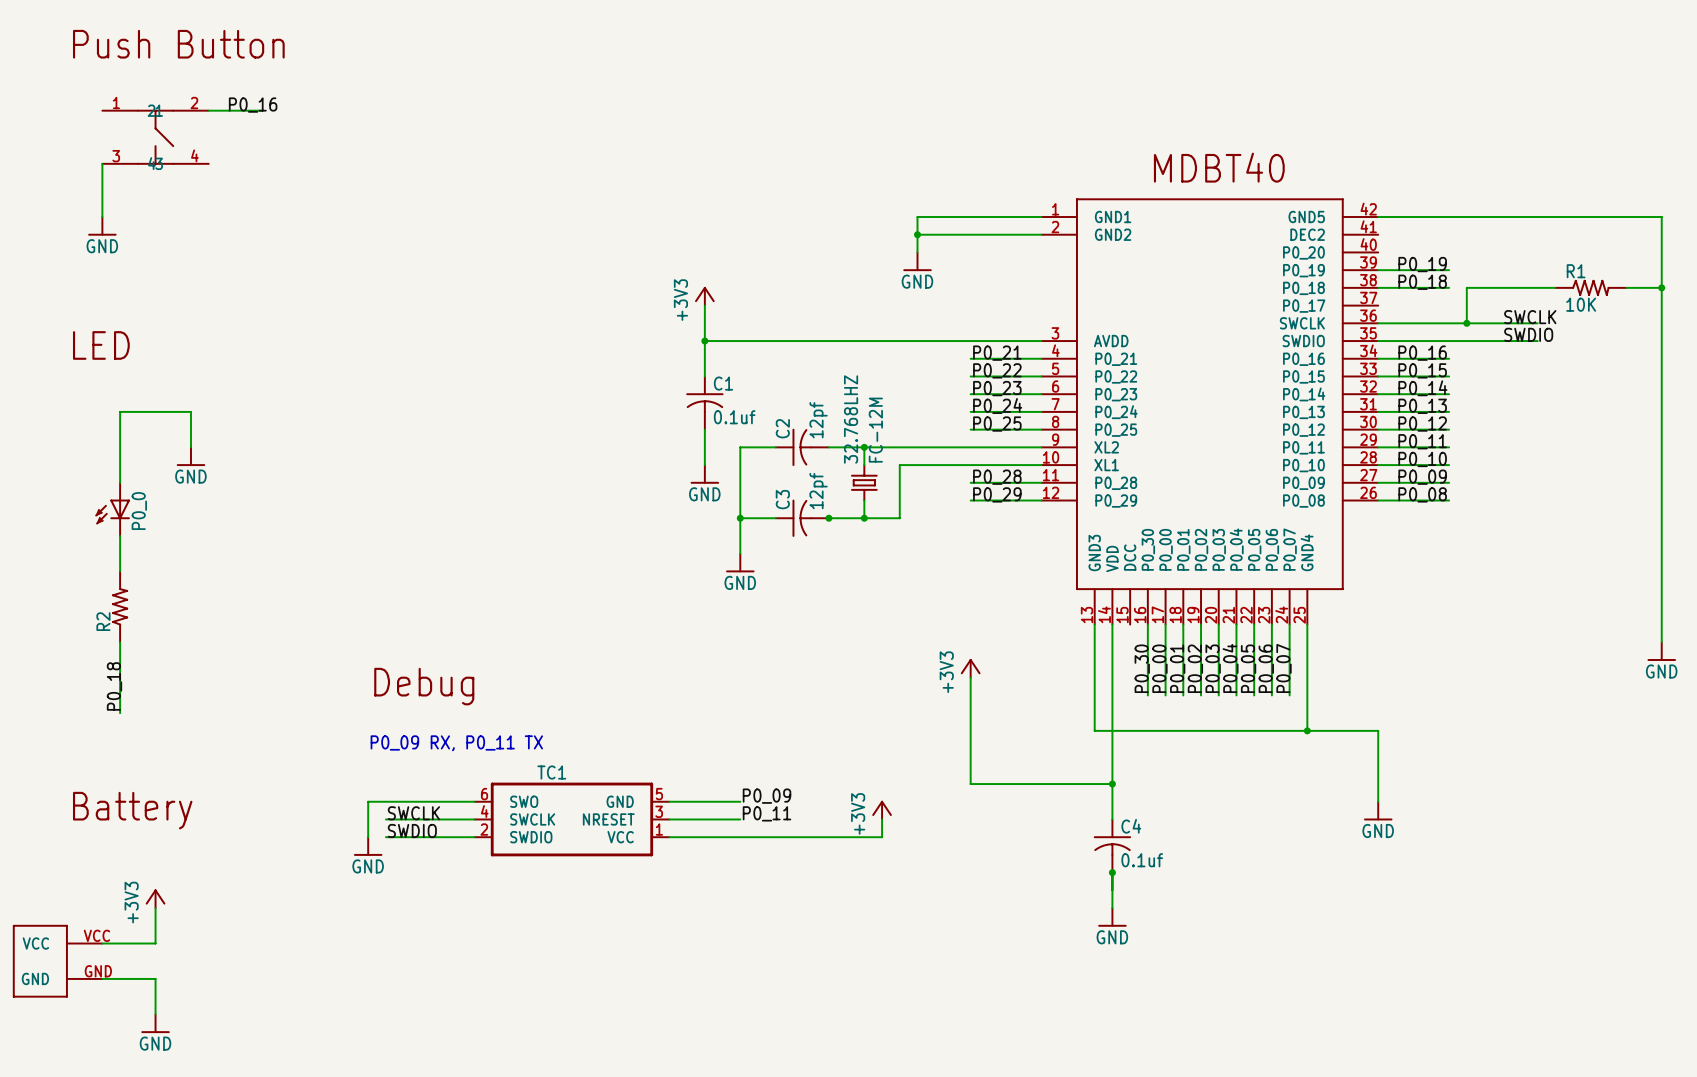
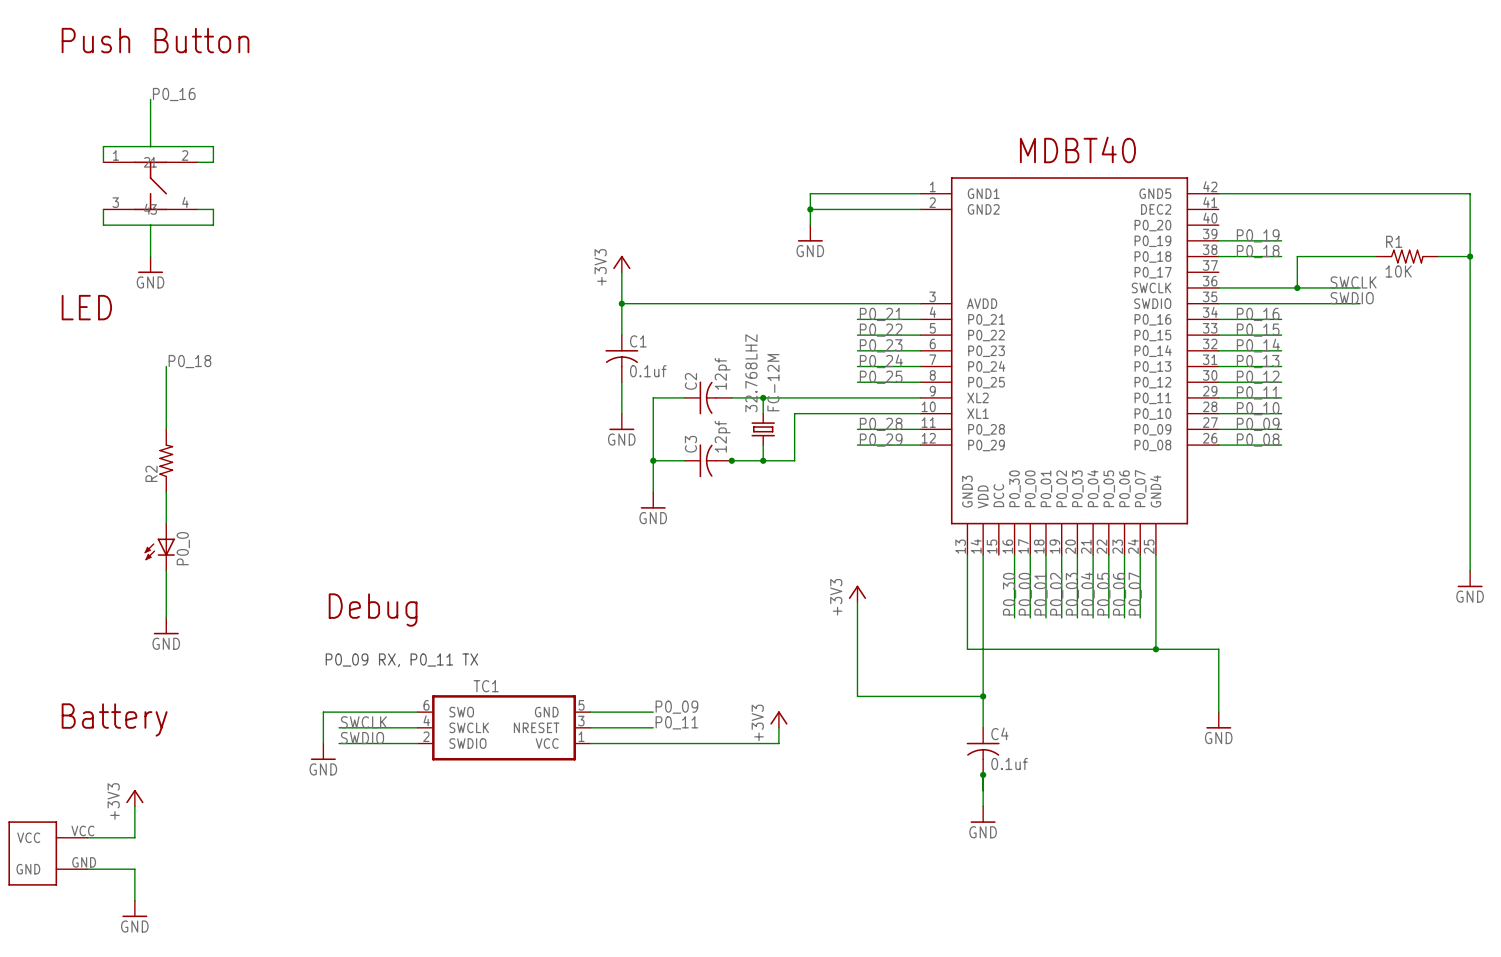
label position: P0_16 (253, 105) -> P0_16 (174, 94)
wire: (208, 110) (261, 110) -> none
part position: (155, 137) -> (150, 185)
wire: (102, 163) (102, 217) -> (150, 99) (150, 146)
wire: none -> (103, 162) (103, 146) (213, 146) (213, 162) (197, 162)
power symbol: GND (102, 226) -> none
wire: none -> (103, 209) (103, 225) (213, 225) (213, 209) (197, 209)
wire: none -> (150, 225) (150, 256)
power symbol: none -> GND (150, 264)
label: none -> P0_18 (189, 361)
wire: (190, 411) (120, 411) (120, 482) -> none
power symbol: GND (190, 456) -> none
P0_0 position: (112, 509) -> (159, 547)
wire: (120, 535) (120, 571) -> (166, 492) (166, 523)
R2 position: (120, 606) -> (166, 460)
wire: (120, 642) (120, 713) -> none
wire: none -> (166, 570) (166, 617)
label: P0_18 (114, 686) -> none
power symbol: none -> GND (166, 626)

